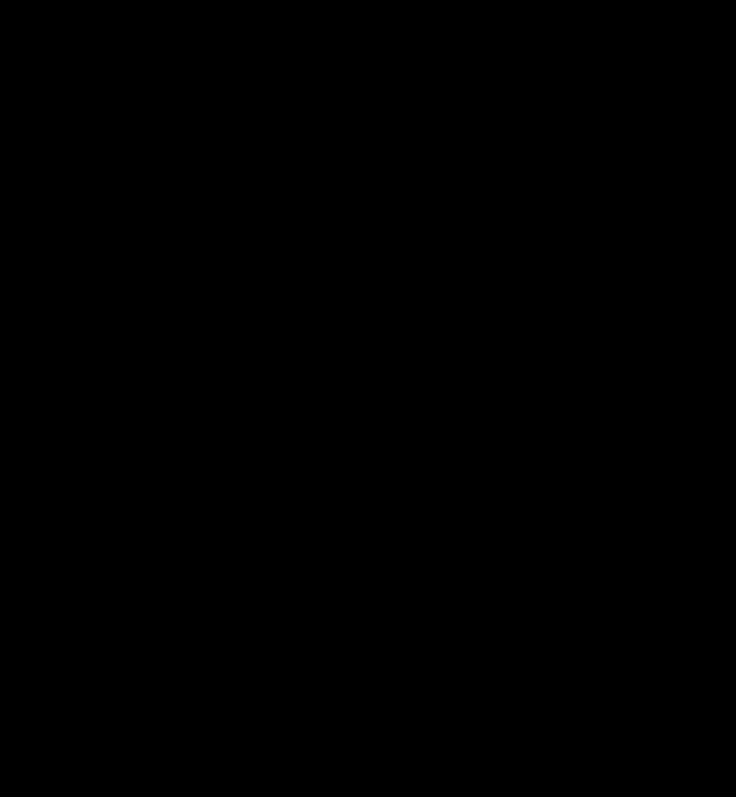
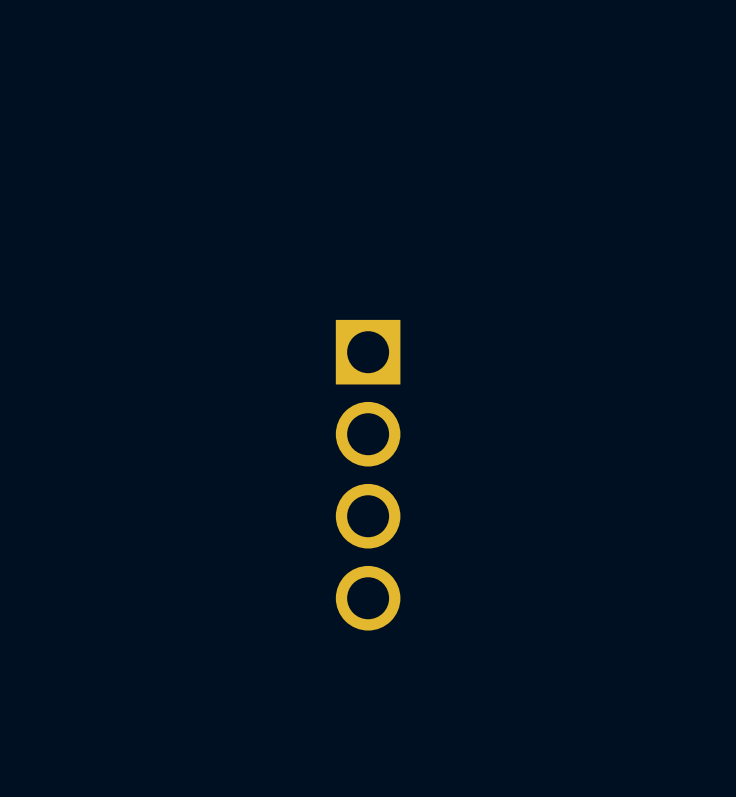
part: none -> (368, 475)

